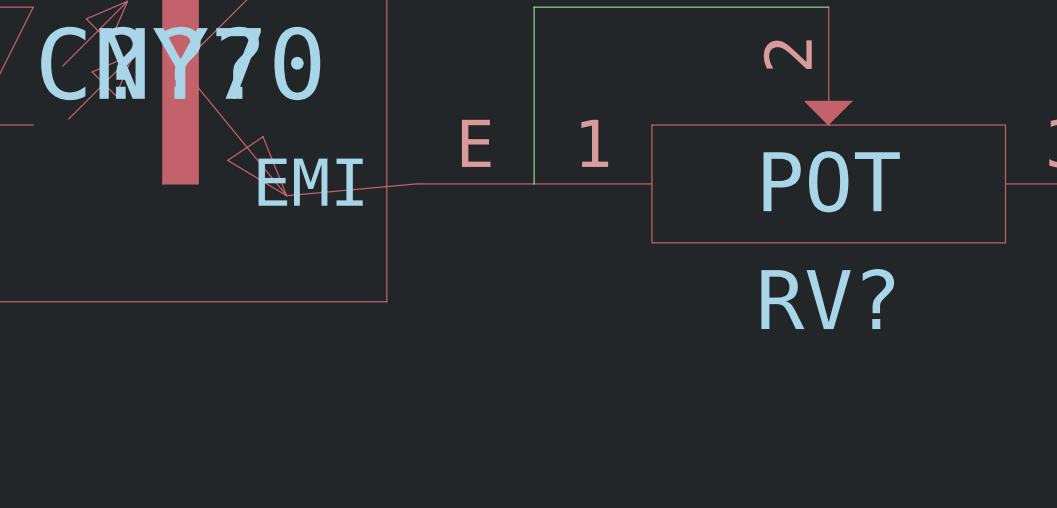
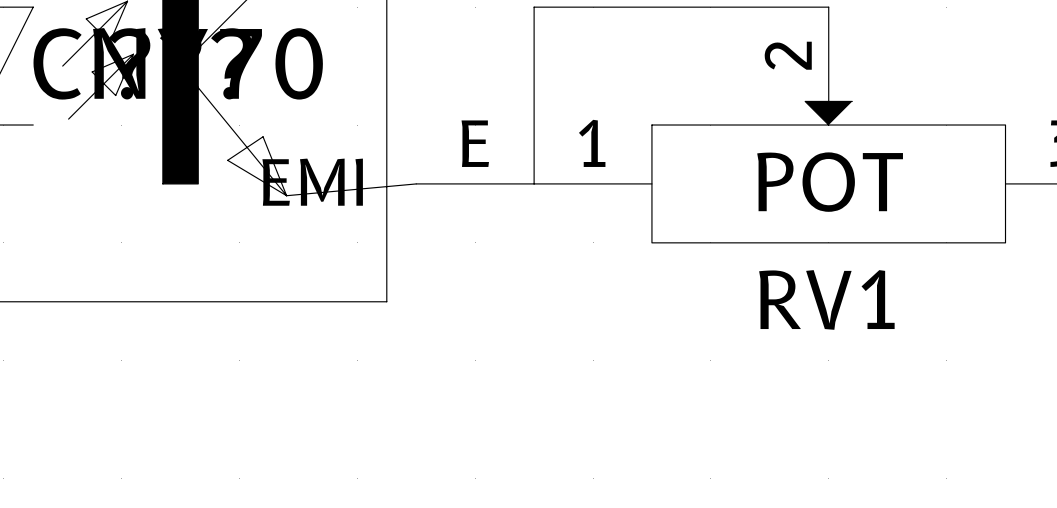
RV? name: RV? (827, 299) -> RV1 (826, 299)

